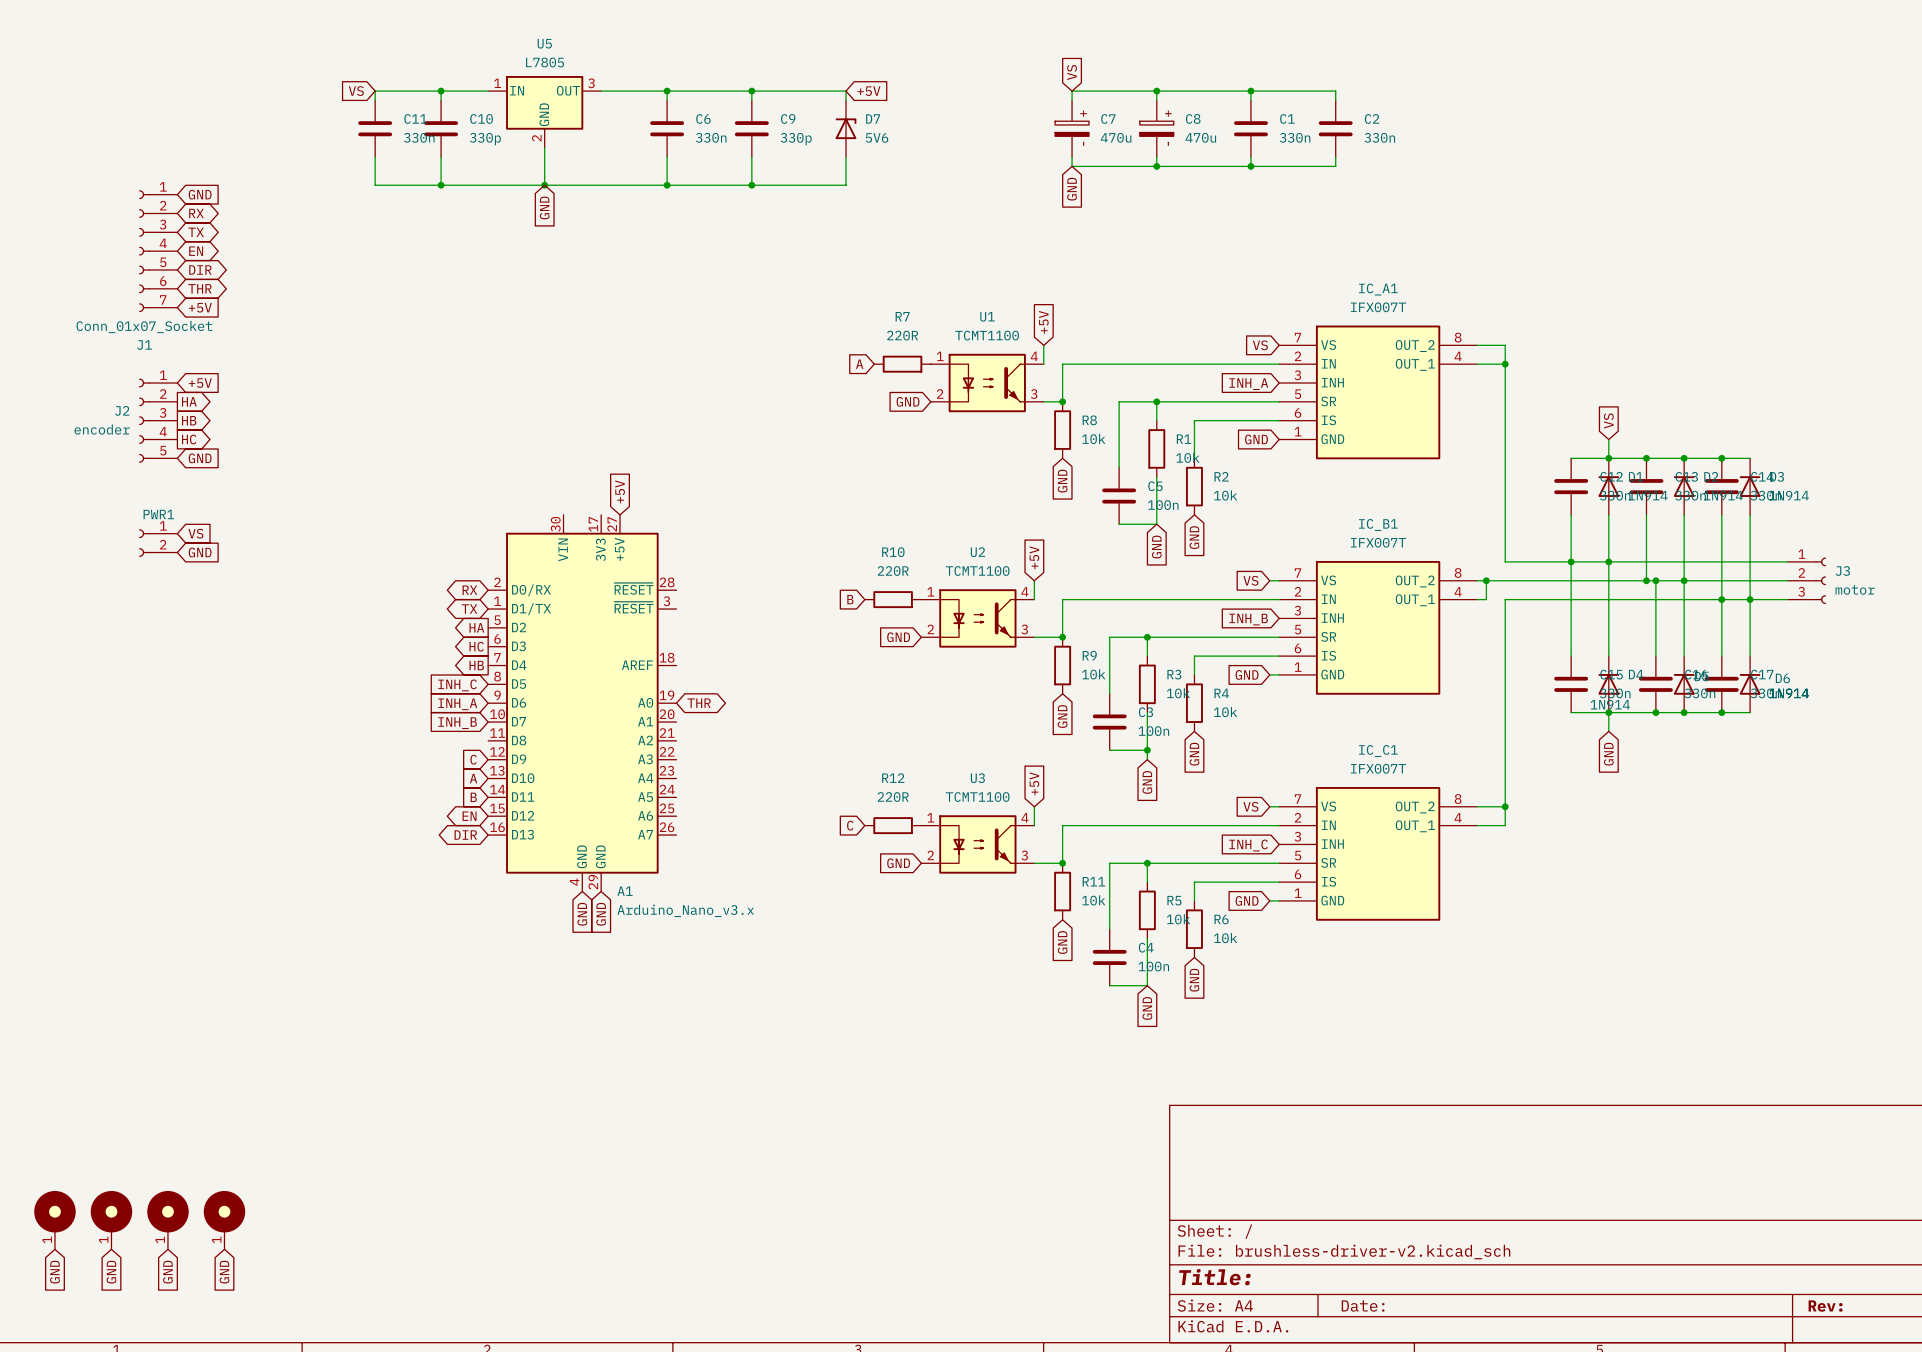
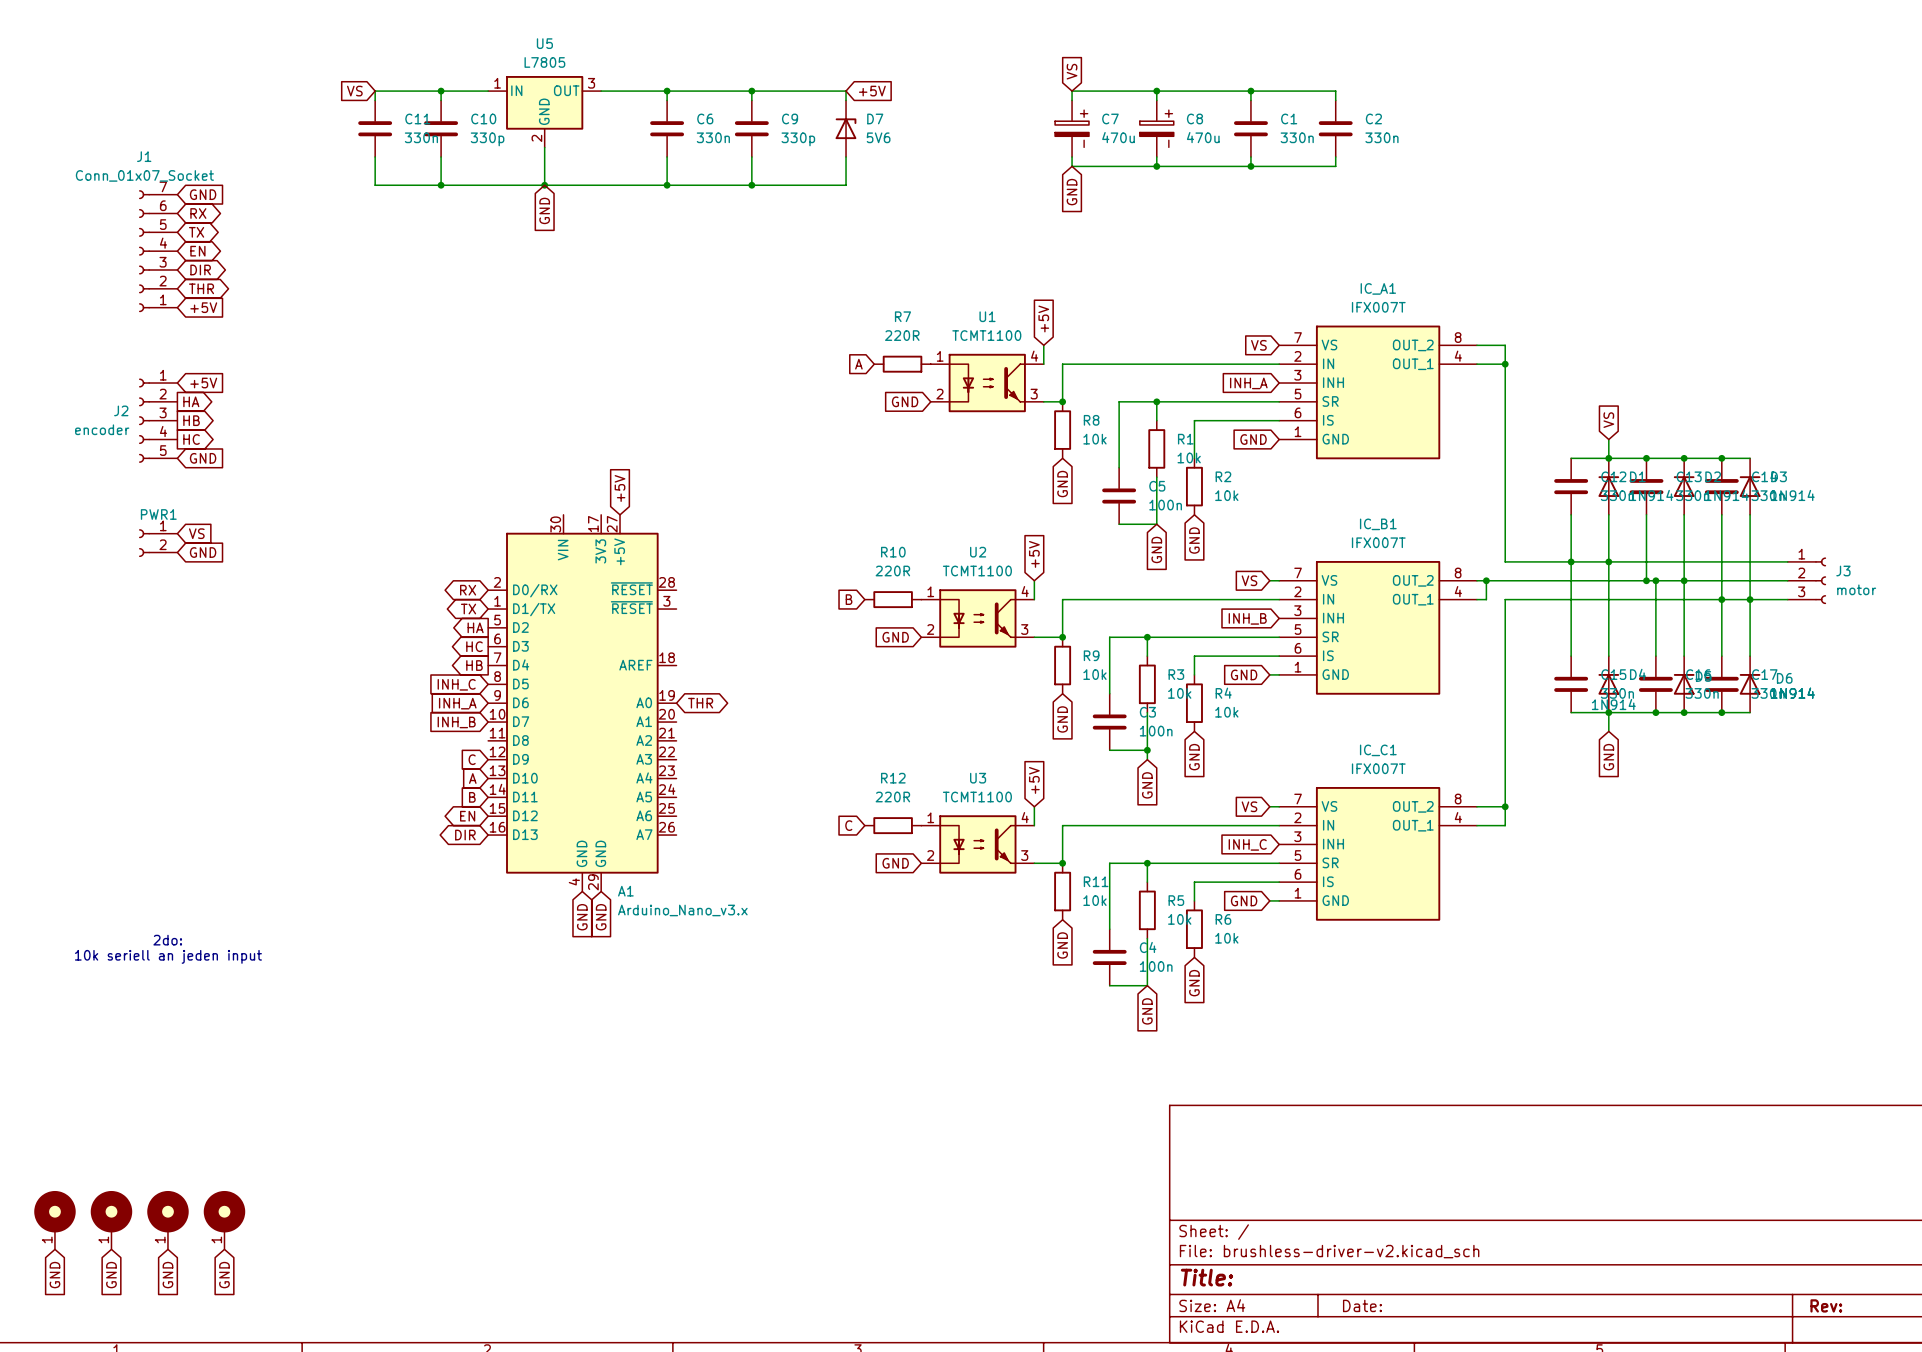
J1 flip: as is (144, 251) -> up-down (144, 251)
text: none -> 2do: (167, 940)
text: none -> 10k seriell an jeden input (168, 956)

